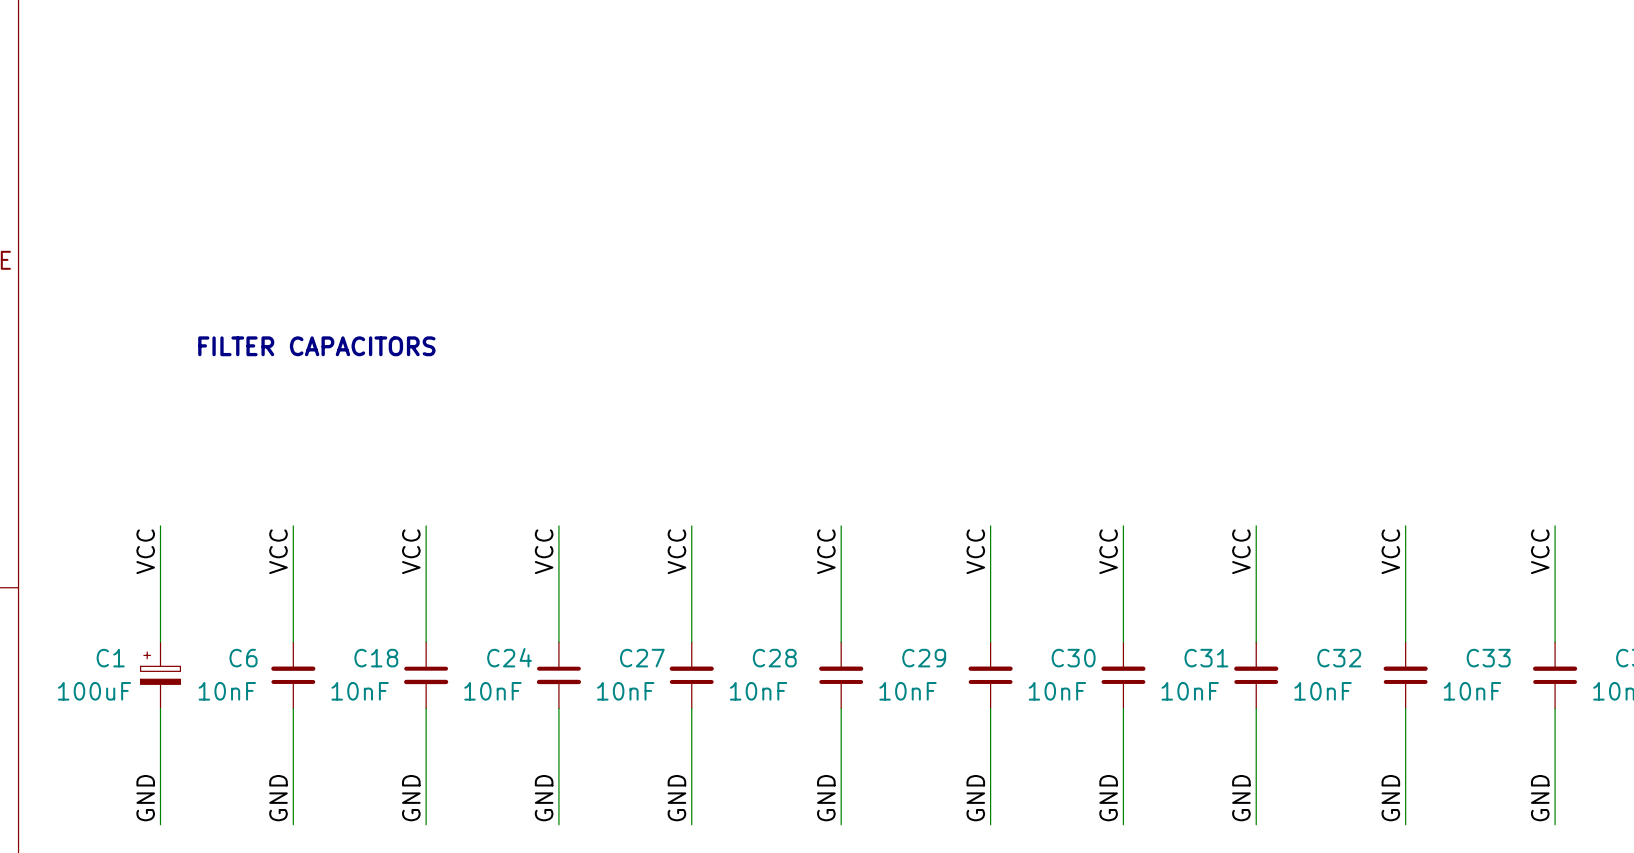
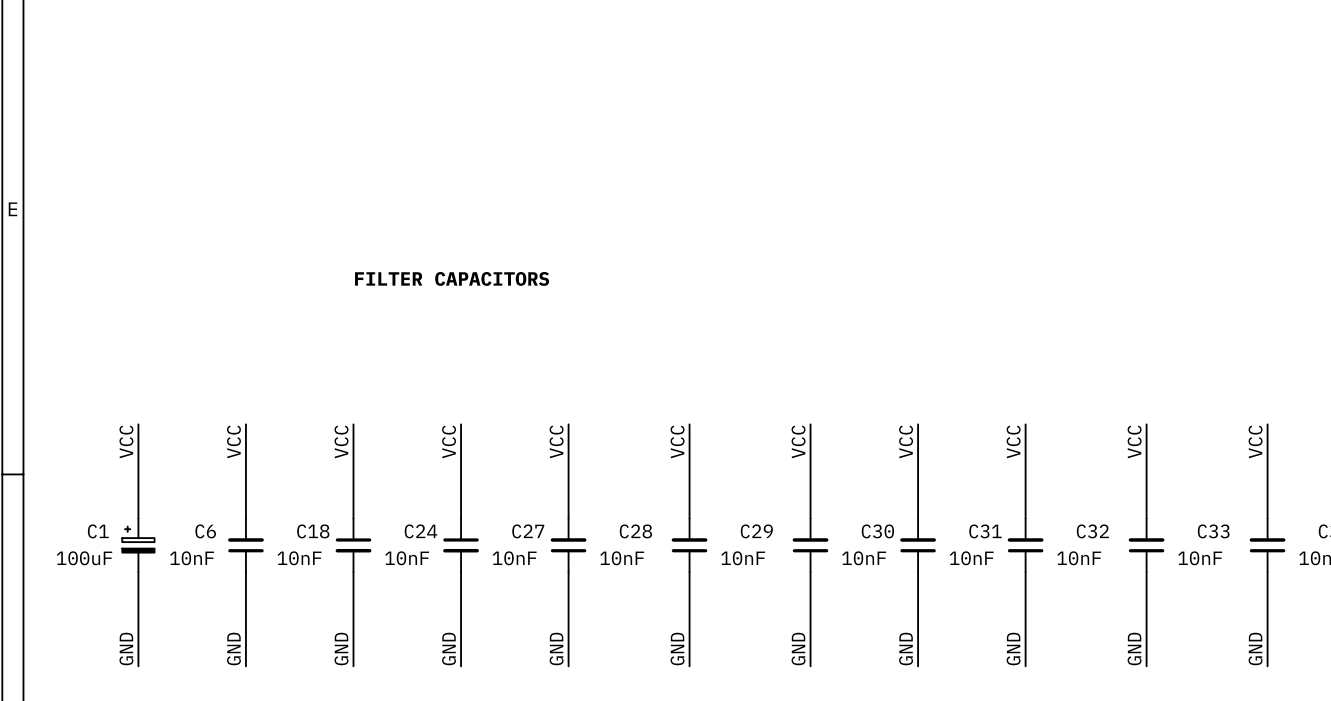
text position: FILTER CAPACITORS (316, 346) -> FILTER CAPACITORS (452, 278)

